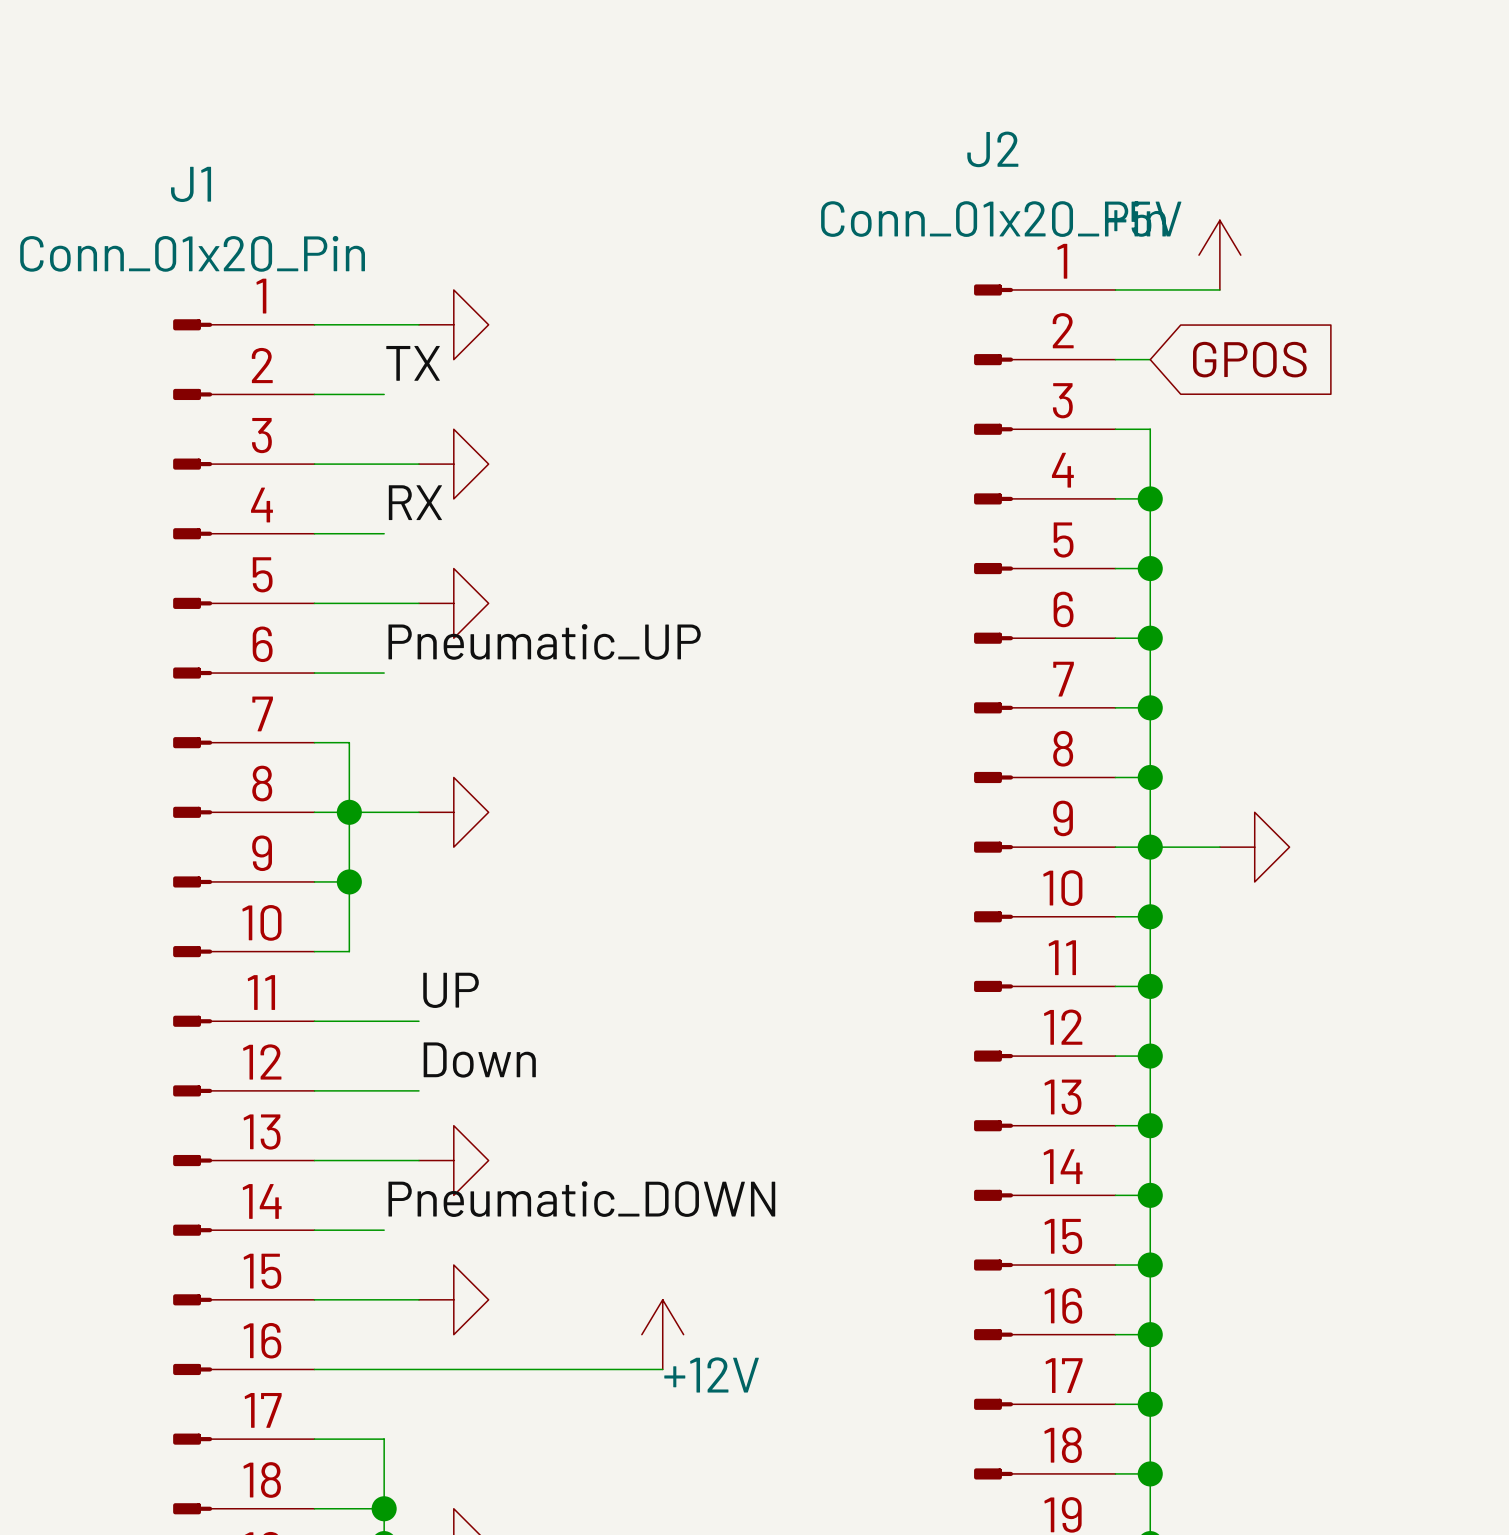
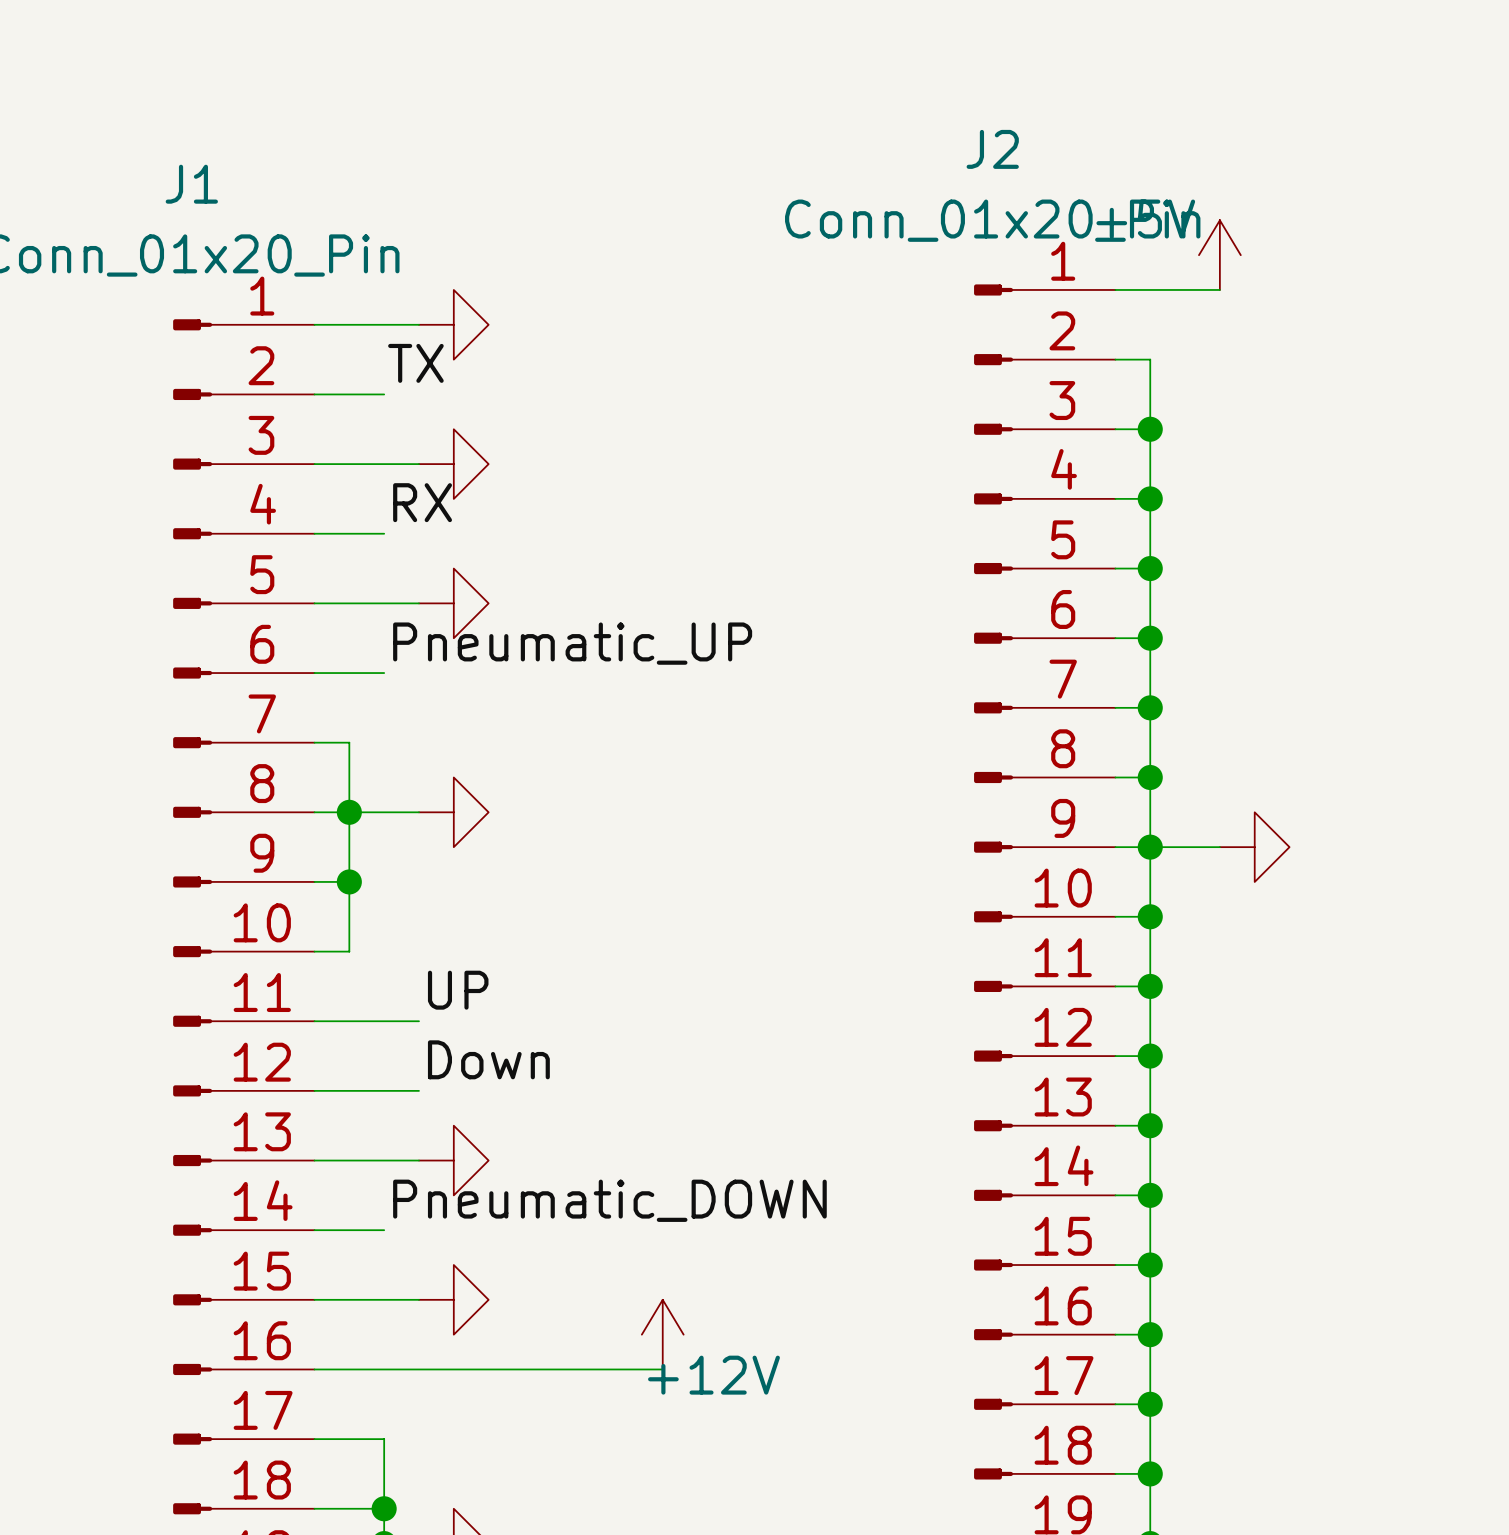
wire: none -> (1150, 359) (1150, 429)
global label: GPOS (1249, 359) -> none
junction: none -> (1150, 429)

